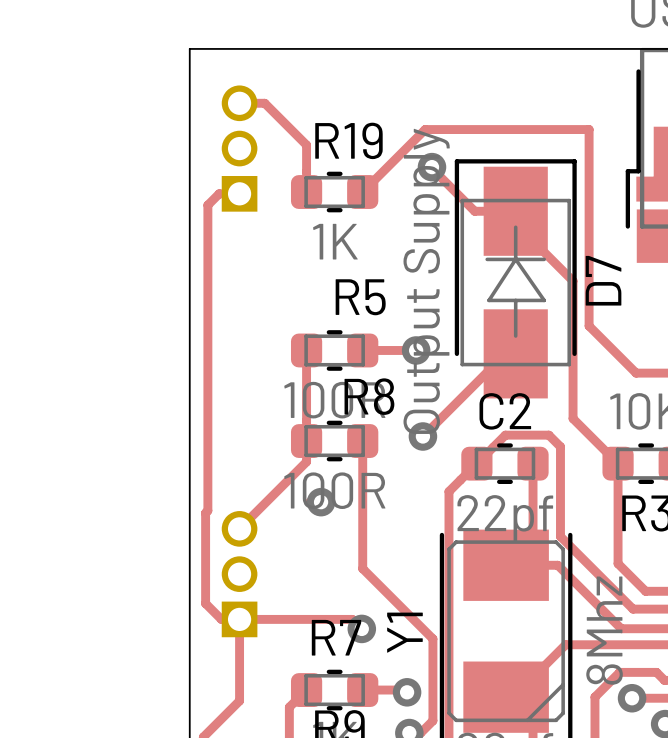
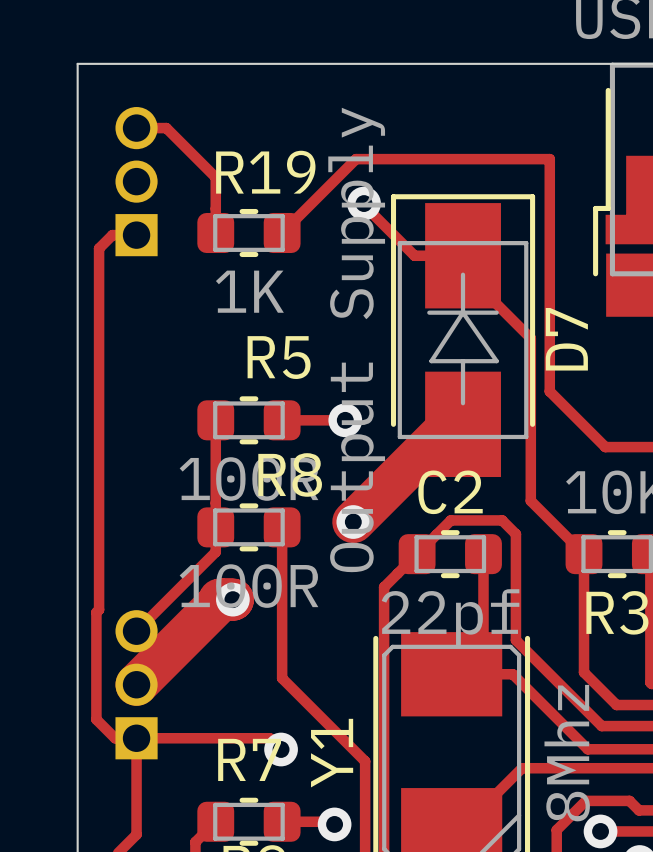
track width: thin (515, 353) (505, 353) (422, 436) -> thick (463, 424) (451, 424) (353, 522)
track: none -> (221, 599) (136, 684)

